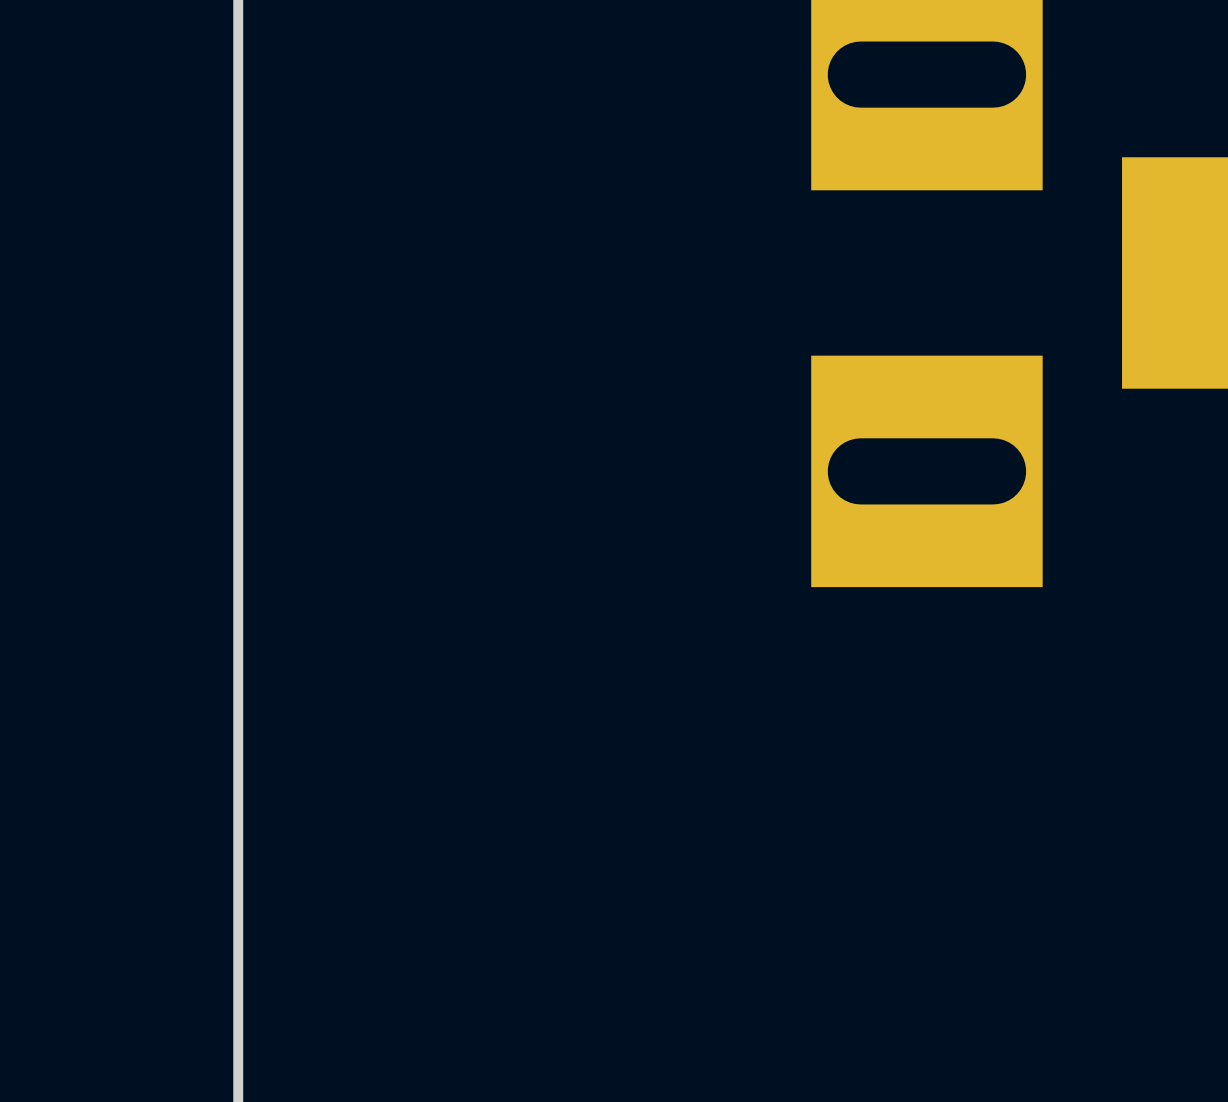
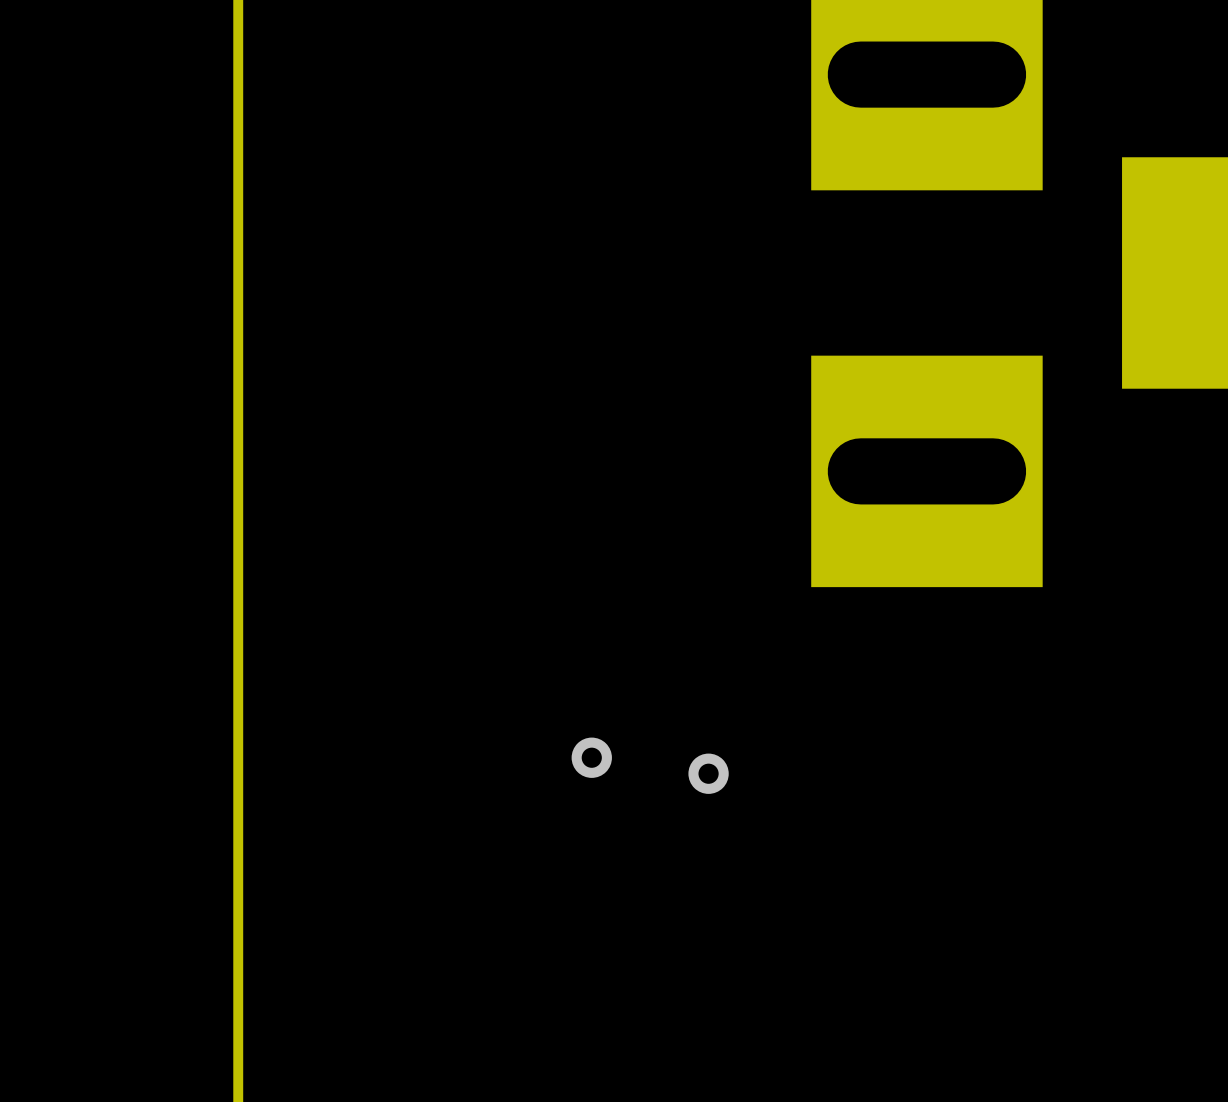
via: none -> (591, 757)
via: none -> (708, 773)

